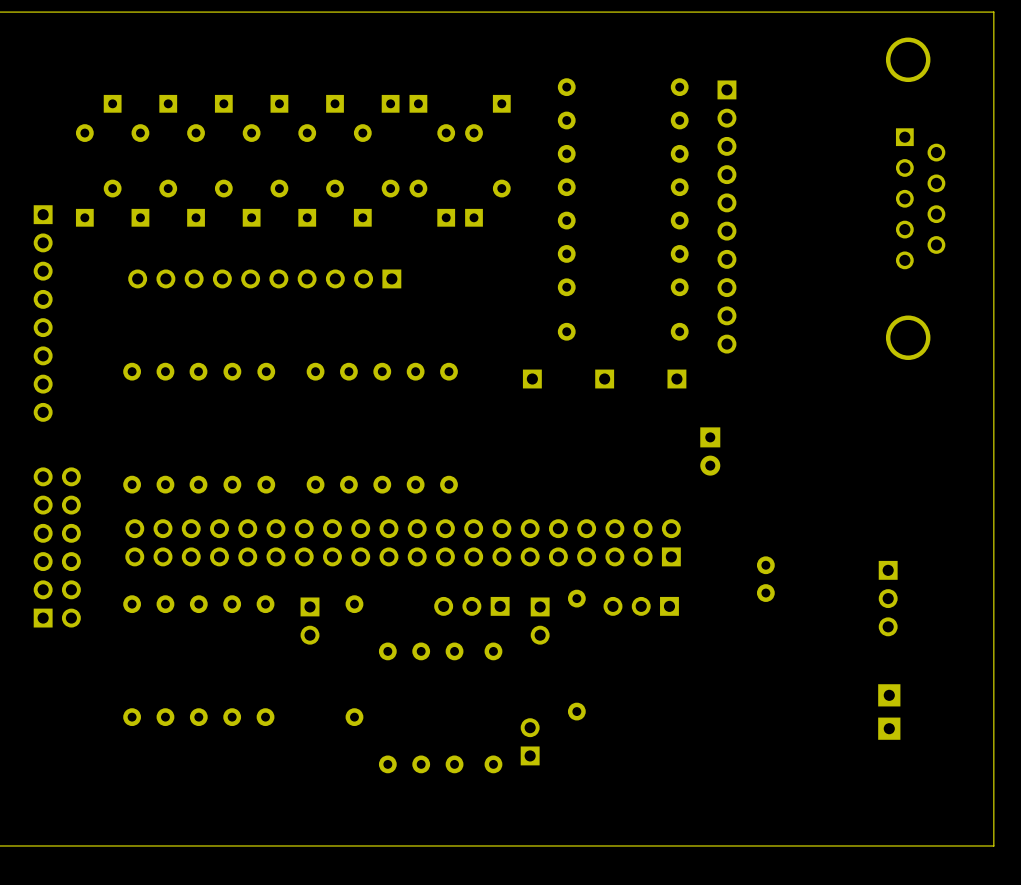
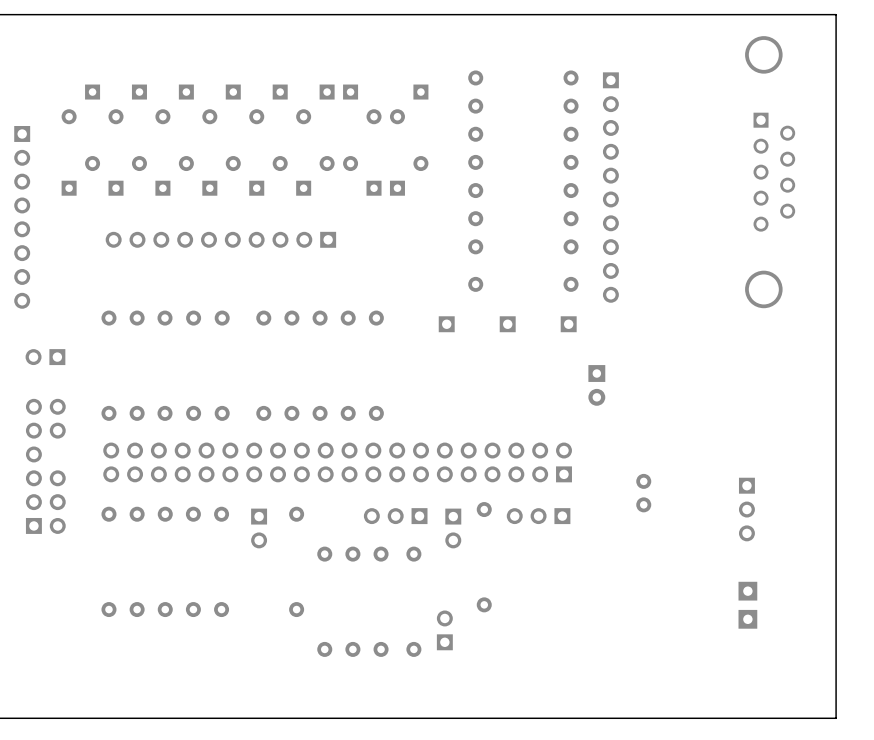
part position: (43, 313) -> (22, 217)
part: none -> (45, 357)
part footprint: [33, 467, 81, 628] -> [25, 398, 66, 534]

